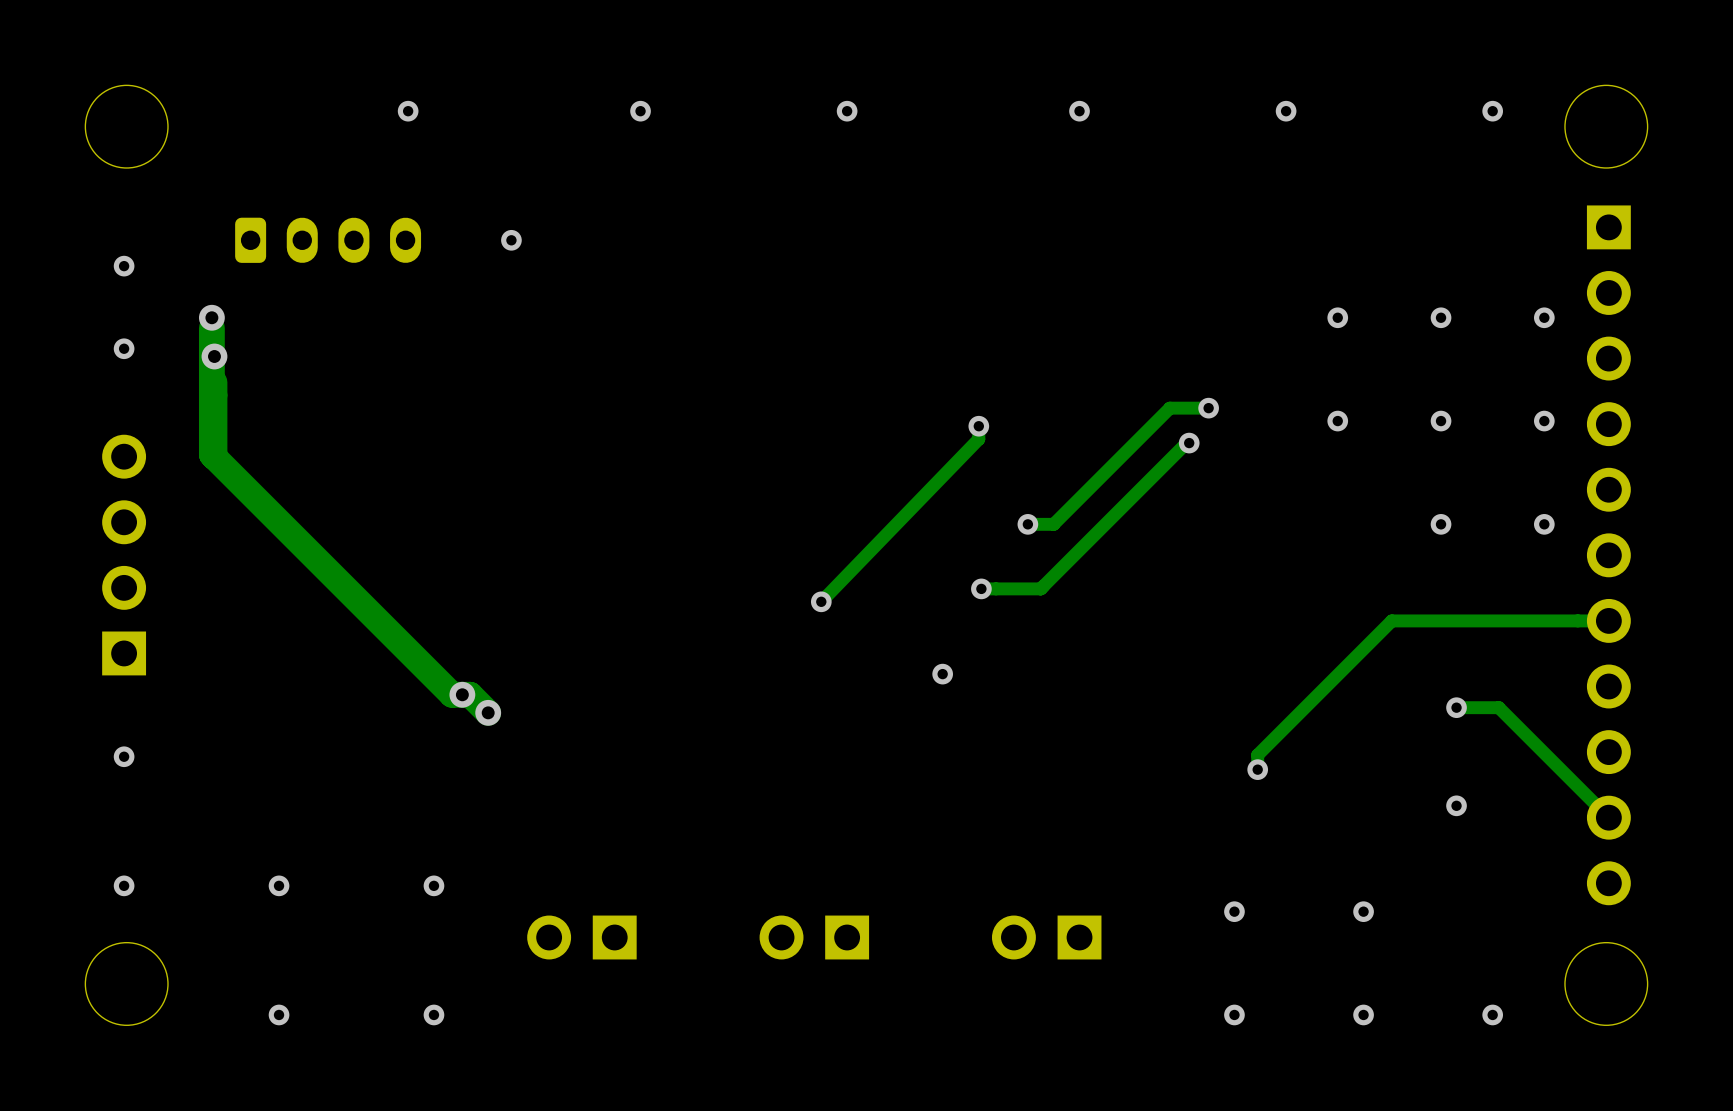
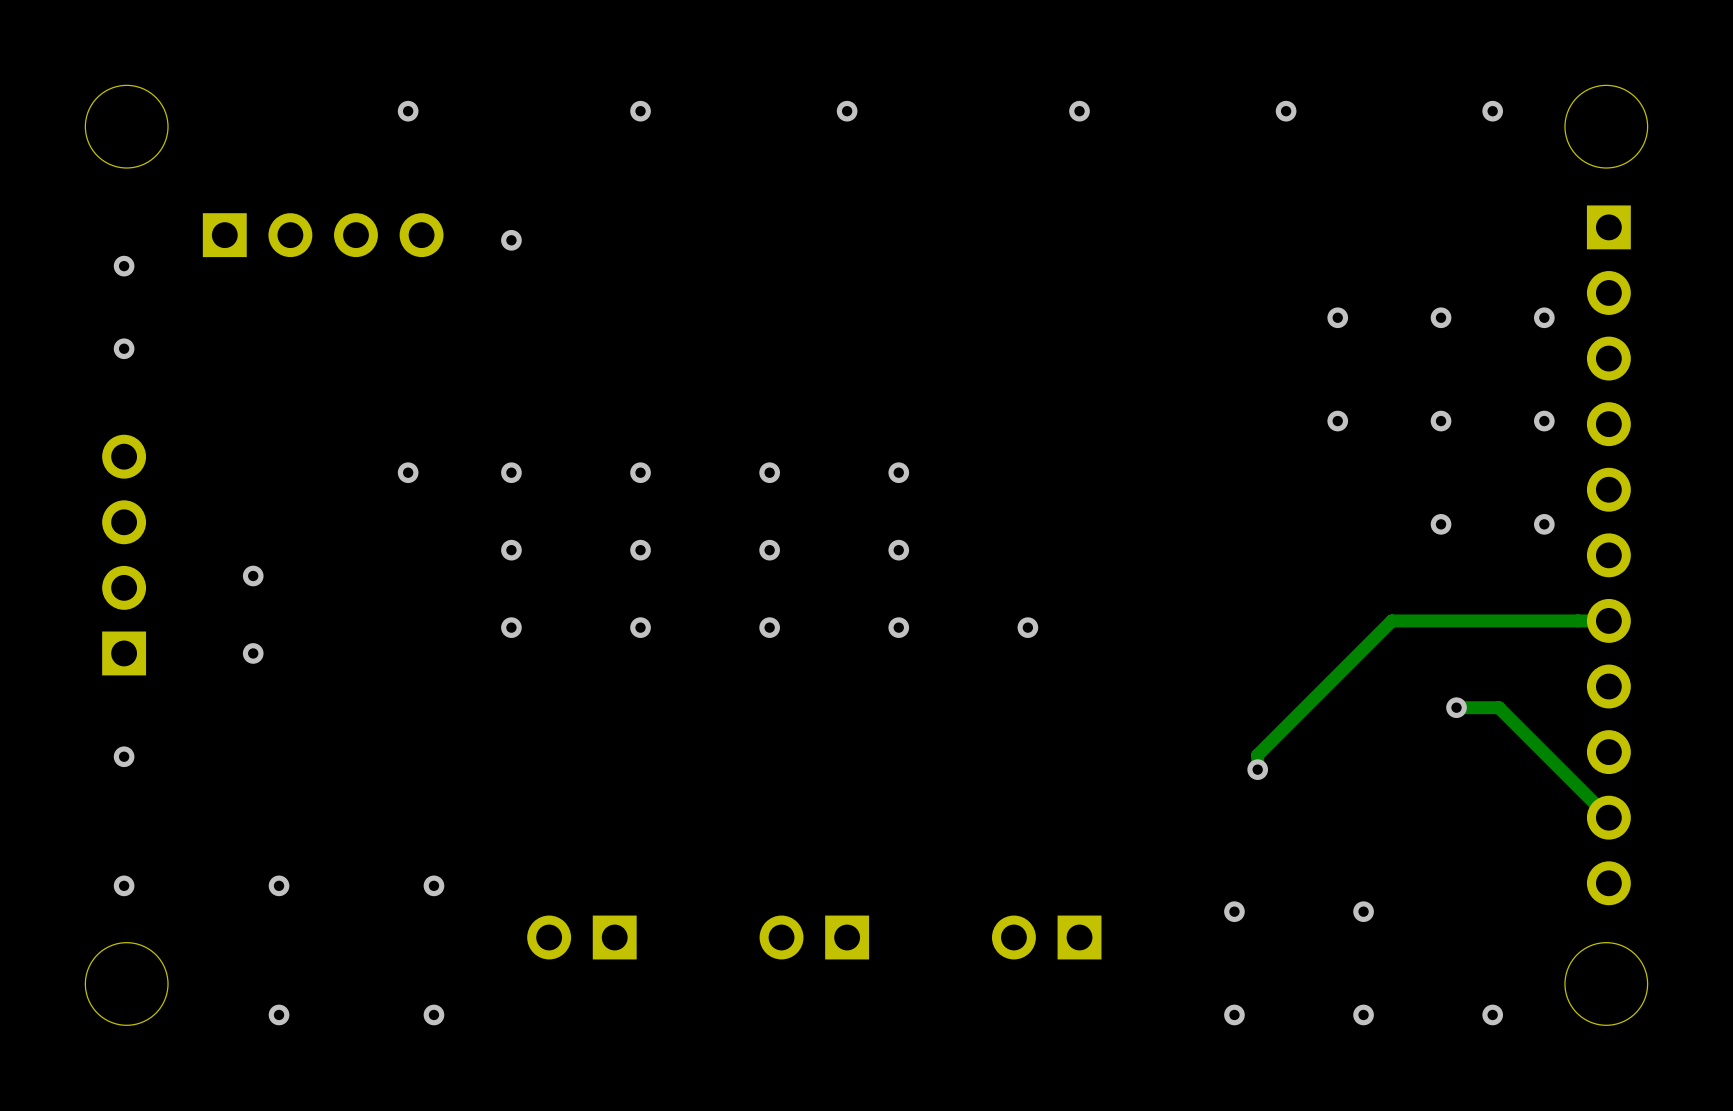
part footprint: [235, 217, 422, 263] -> [202, 213, 444, 258]
via: (211, 317) -> none
via: (214, 356) -> none
track: (1208, 408) (1169, 408) (1053, 524) (1027, 524) -> none
via: (1208, 408) -> none
track: (978, 426) (978, 439) (821, 601) -> none
via: (978, 426) -> none
track: (1189, 443) (1186, 443) (1040, 588) (981, 588) -> none
via: (1189, 443) -> none
track: (214, 457) (214, 382) (214, 330) (211, 328) (211, 454) (452, 694) (470, 694) (488, 712) -> none
via: none -> (408, 472)
via: none -> (511, 472)
via: none -> (640, 472)
via: none -> (769, 472)
via: none -> (898, 472)
via: (1027, 524) -> none
via: none -> (511, 550)
via: none -> (640, 550)
via: none -> (769, 550)
via: none -> (898, 550)
via: none -> (253, 575)
via: (981, 588) -> none
via: (821, 601) -> none
via: none -> (511, 627)
via: none -> (640, 627)
via: none -> (769, 627)
via: none -> (898, 627)
via: none -> (1027, 627)
via: none -> (253, 653)
via: (942, 674) -> none
via: (462, 694) -> none
via: (488, 712) -> none
via: (1456, 805) -> none

